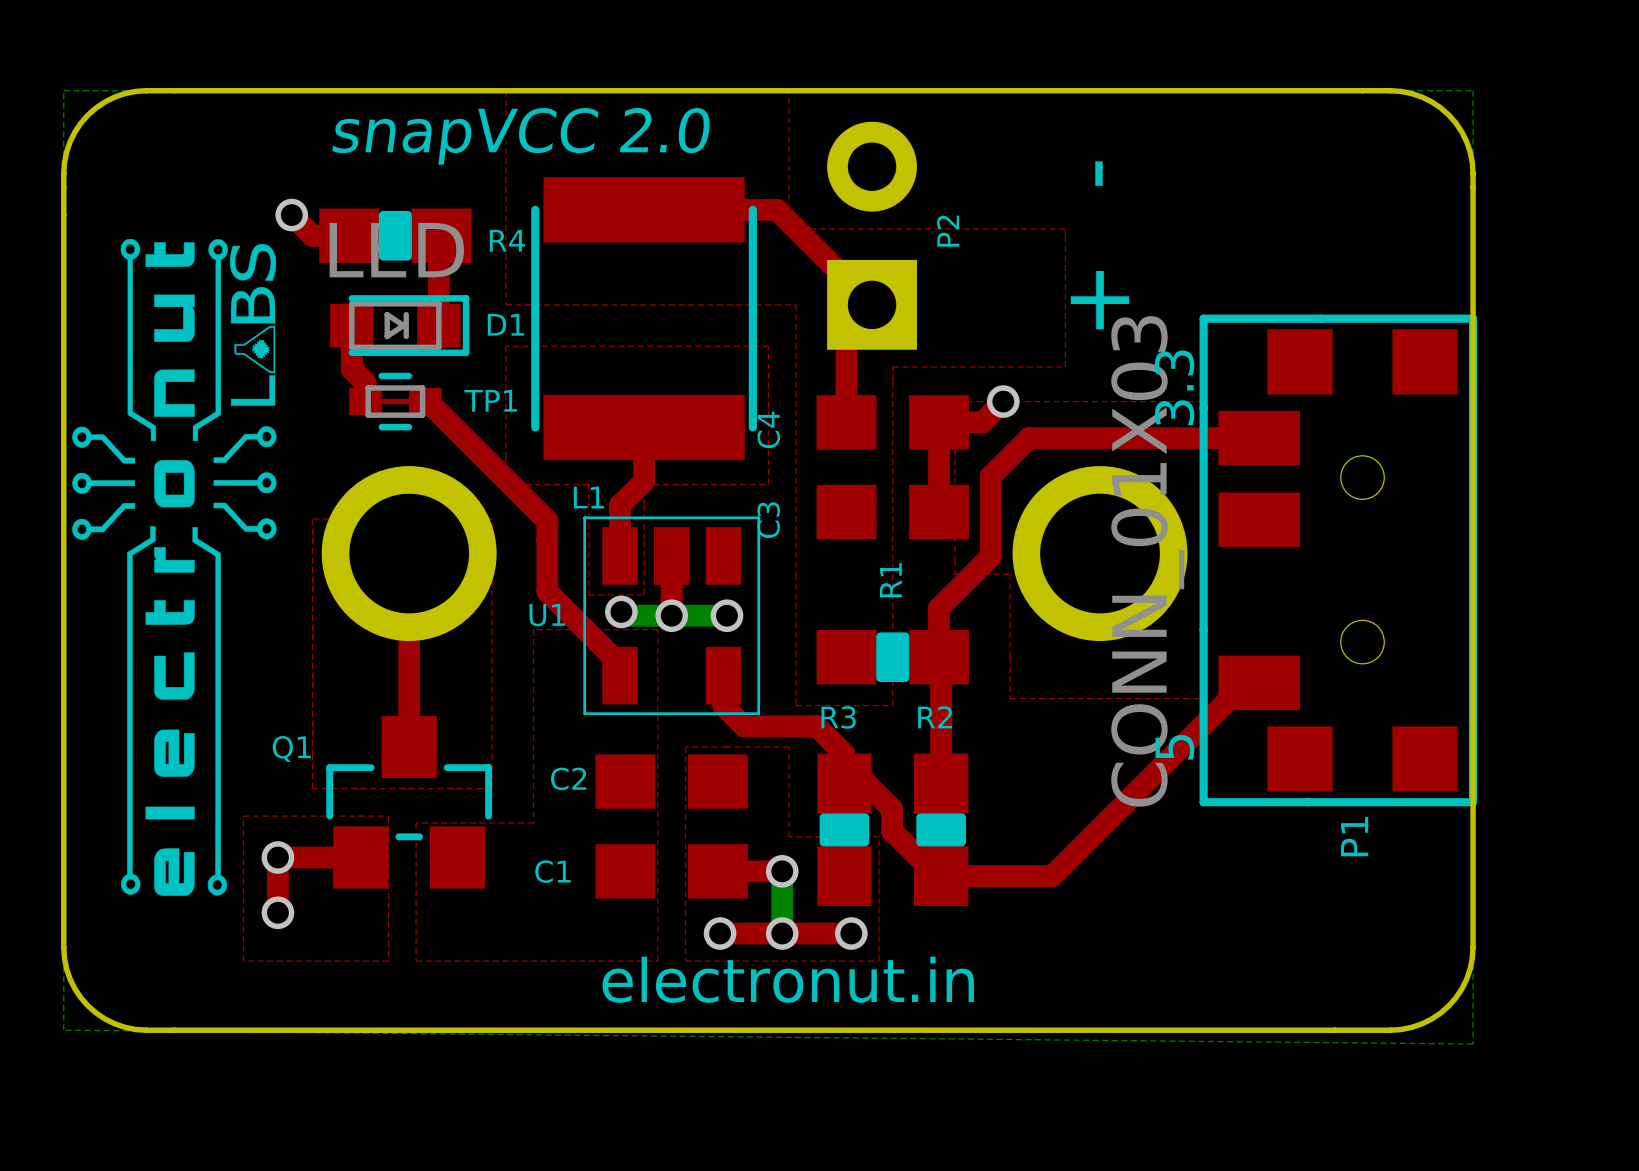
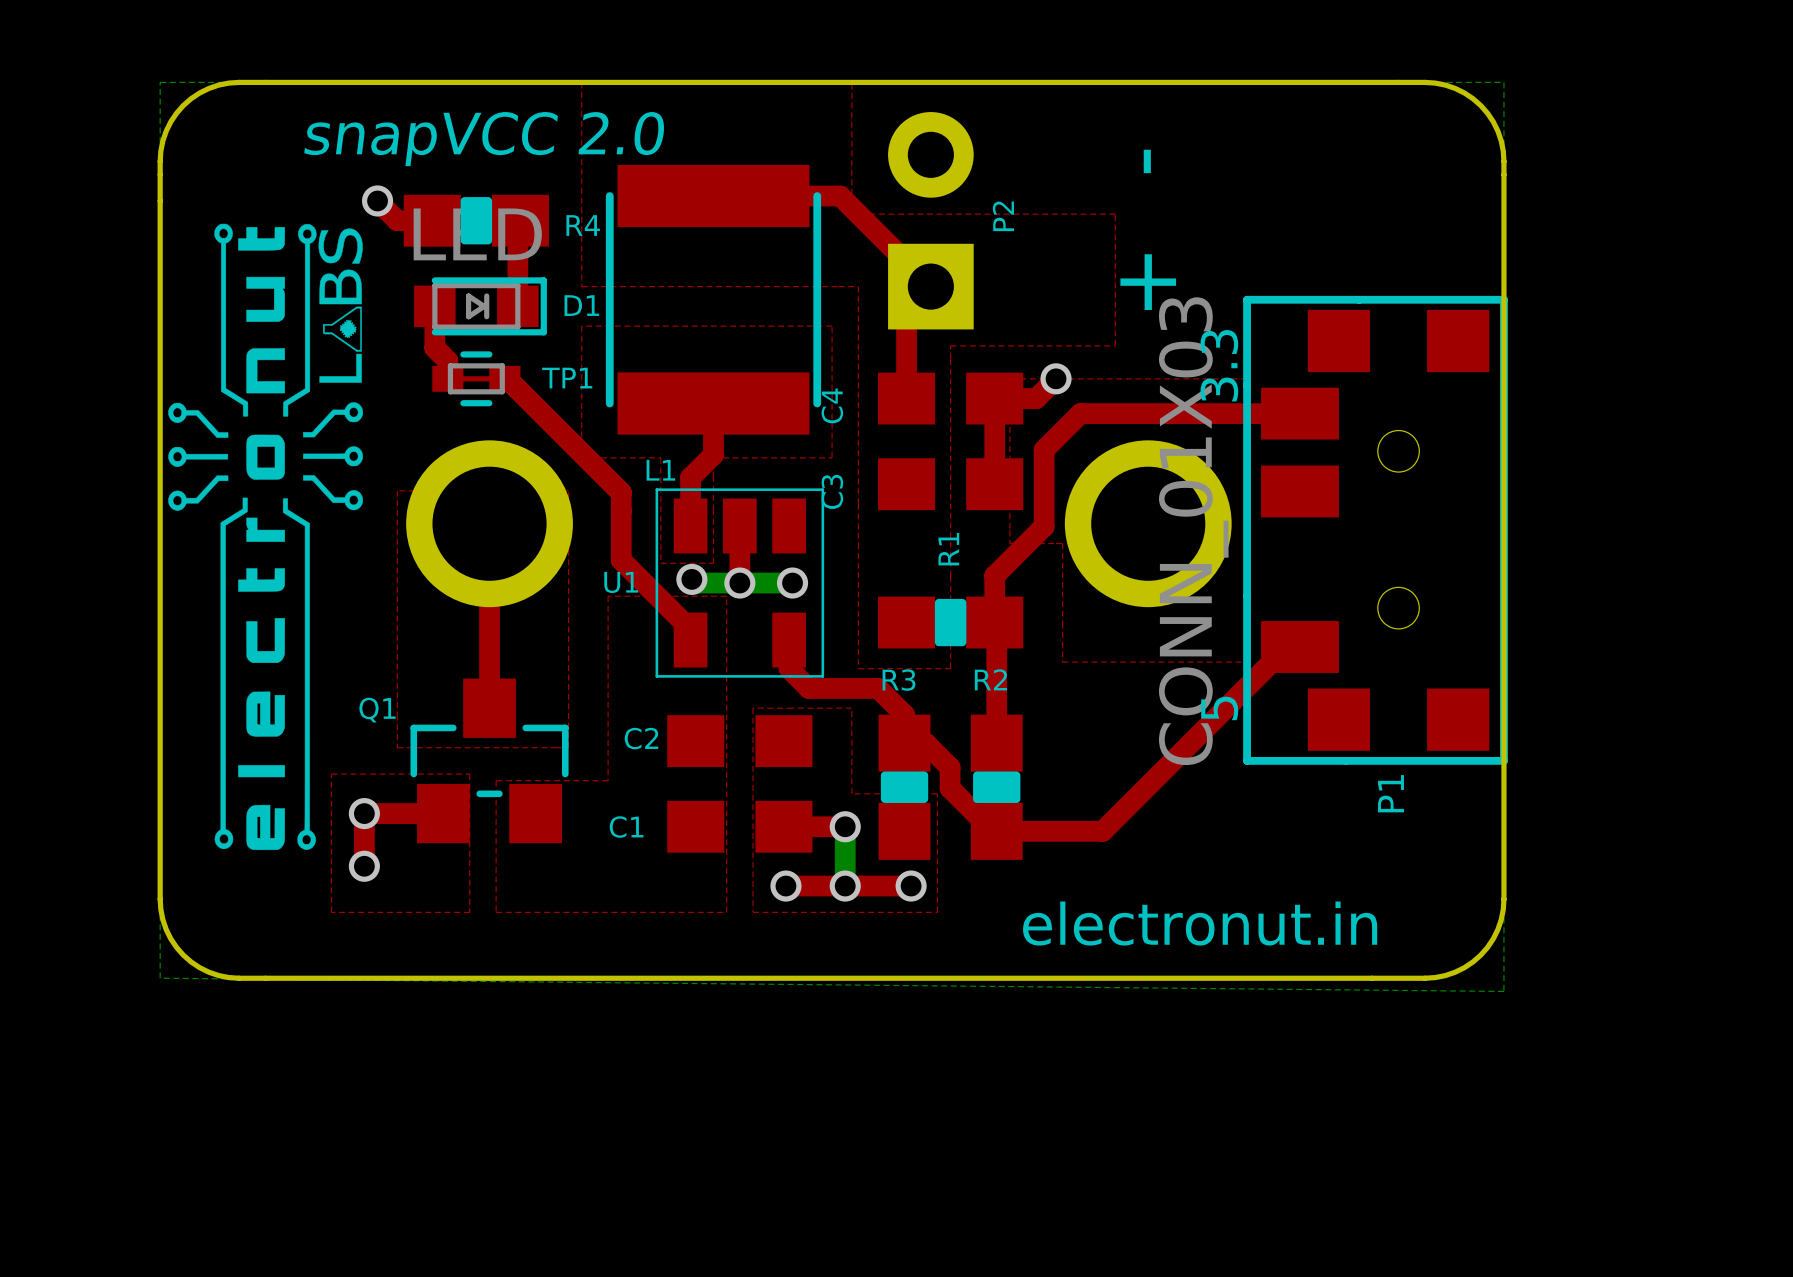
text position: snapVCC 2.0 (521, 136) -> snapVCC 2.0 (484, 139)
text position: electronut.in (788, 979) -> electronut.in (1200, 923)

